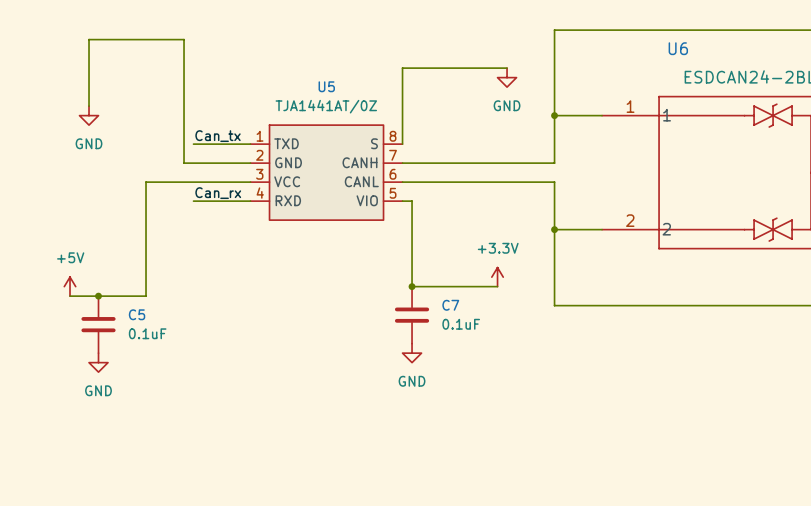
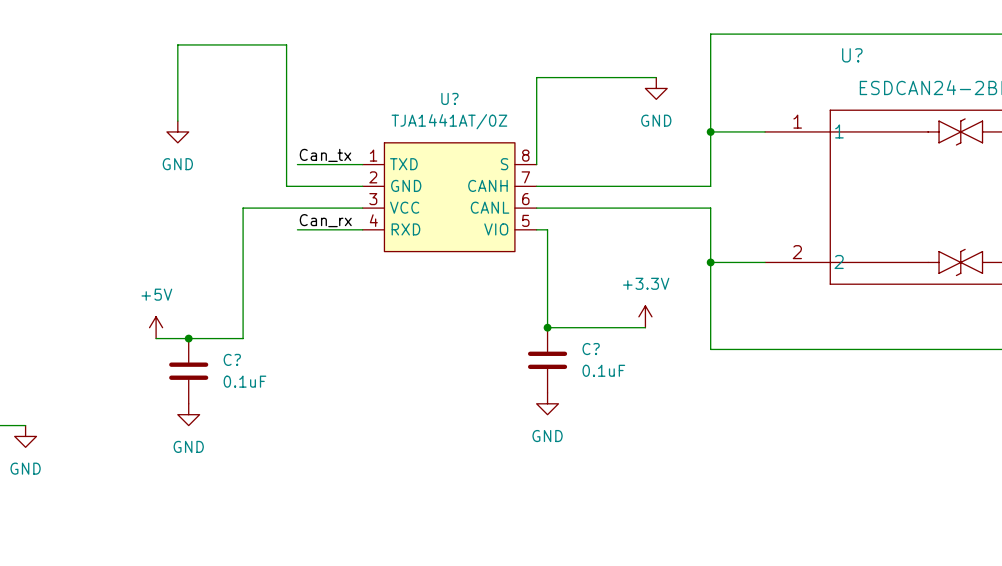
U6 name: U6 (678, 48) -> U? (852, 55)
U5 name: U5 (326, 86) -> U? (449, 98)
C7 name: C7 (450, 305) -> C? (591, 349)
C5 name: C5 (137, 314) -> C? (232, 359)

